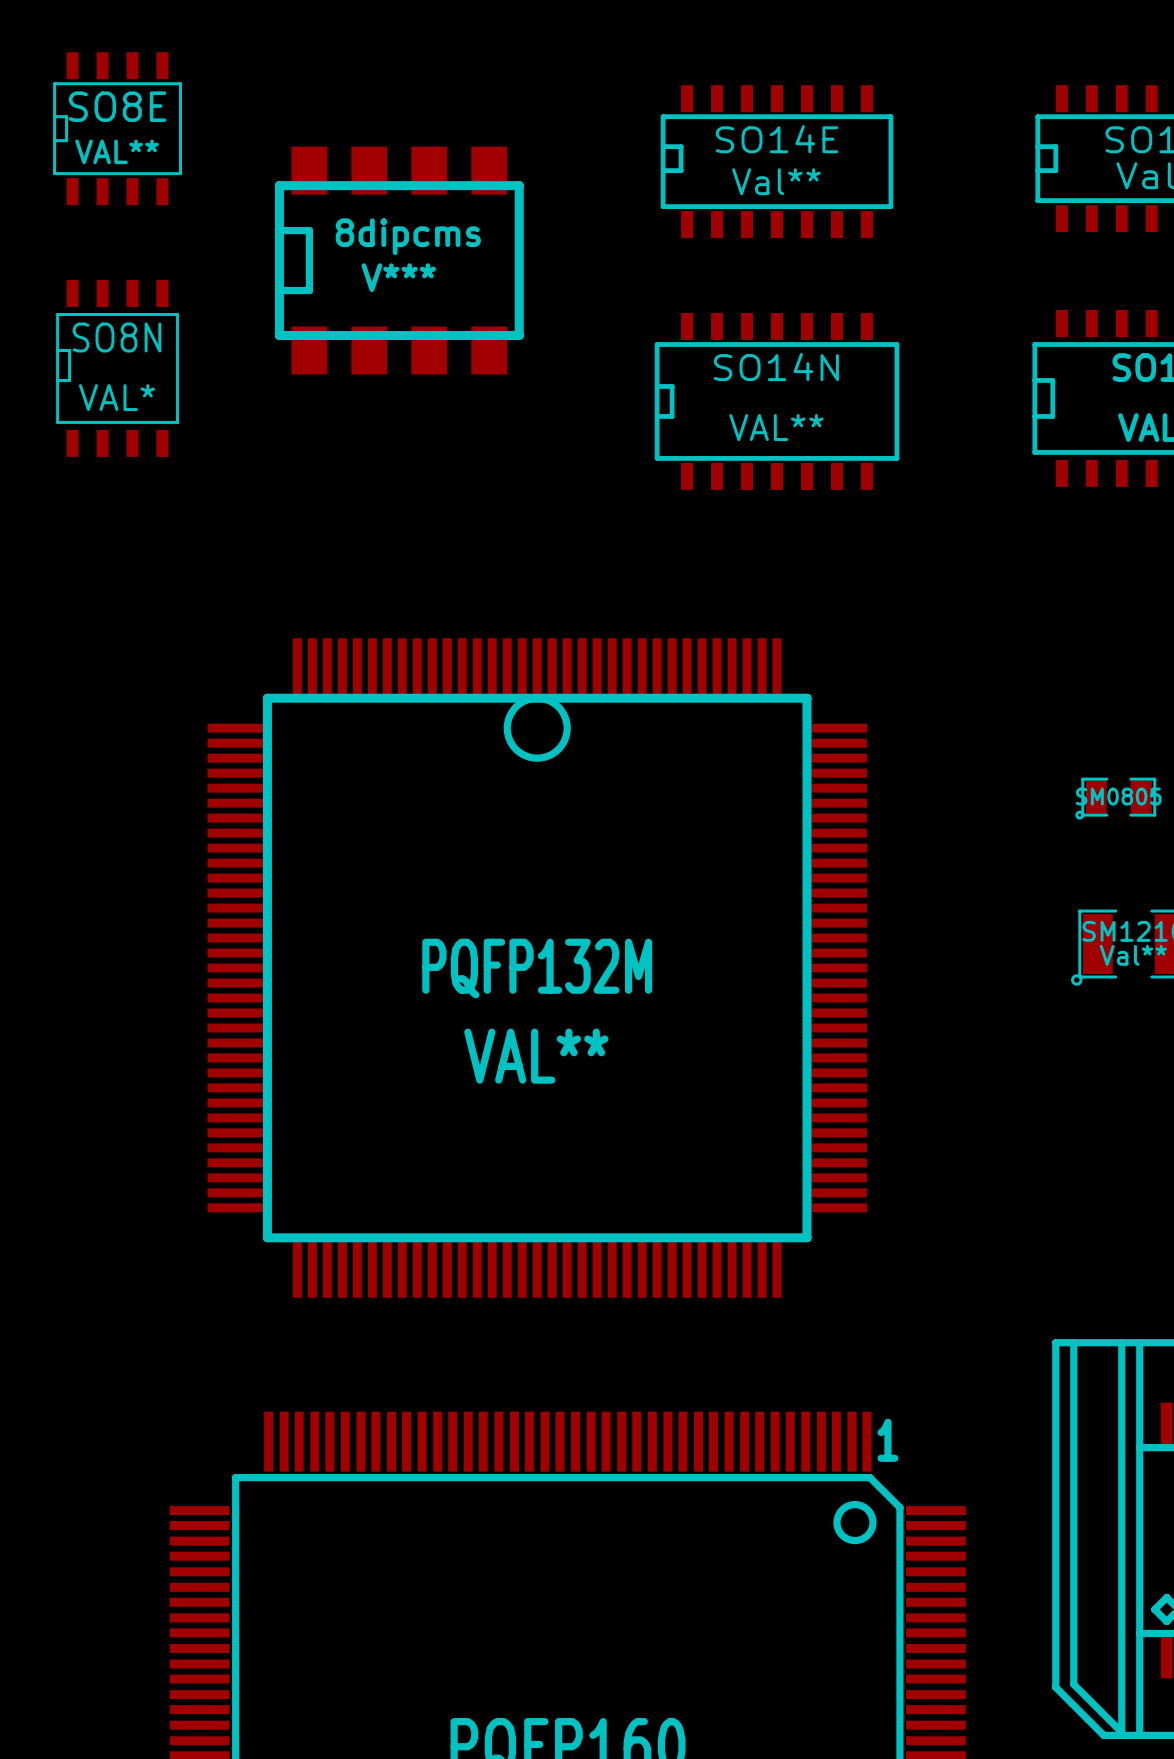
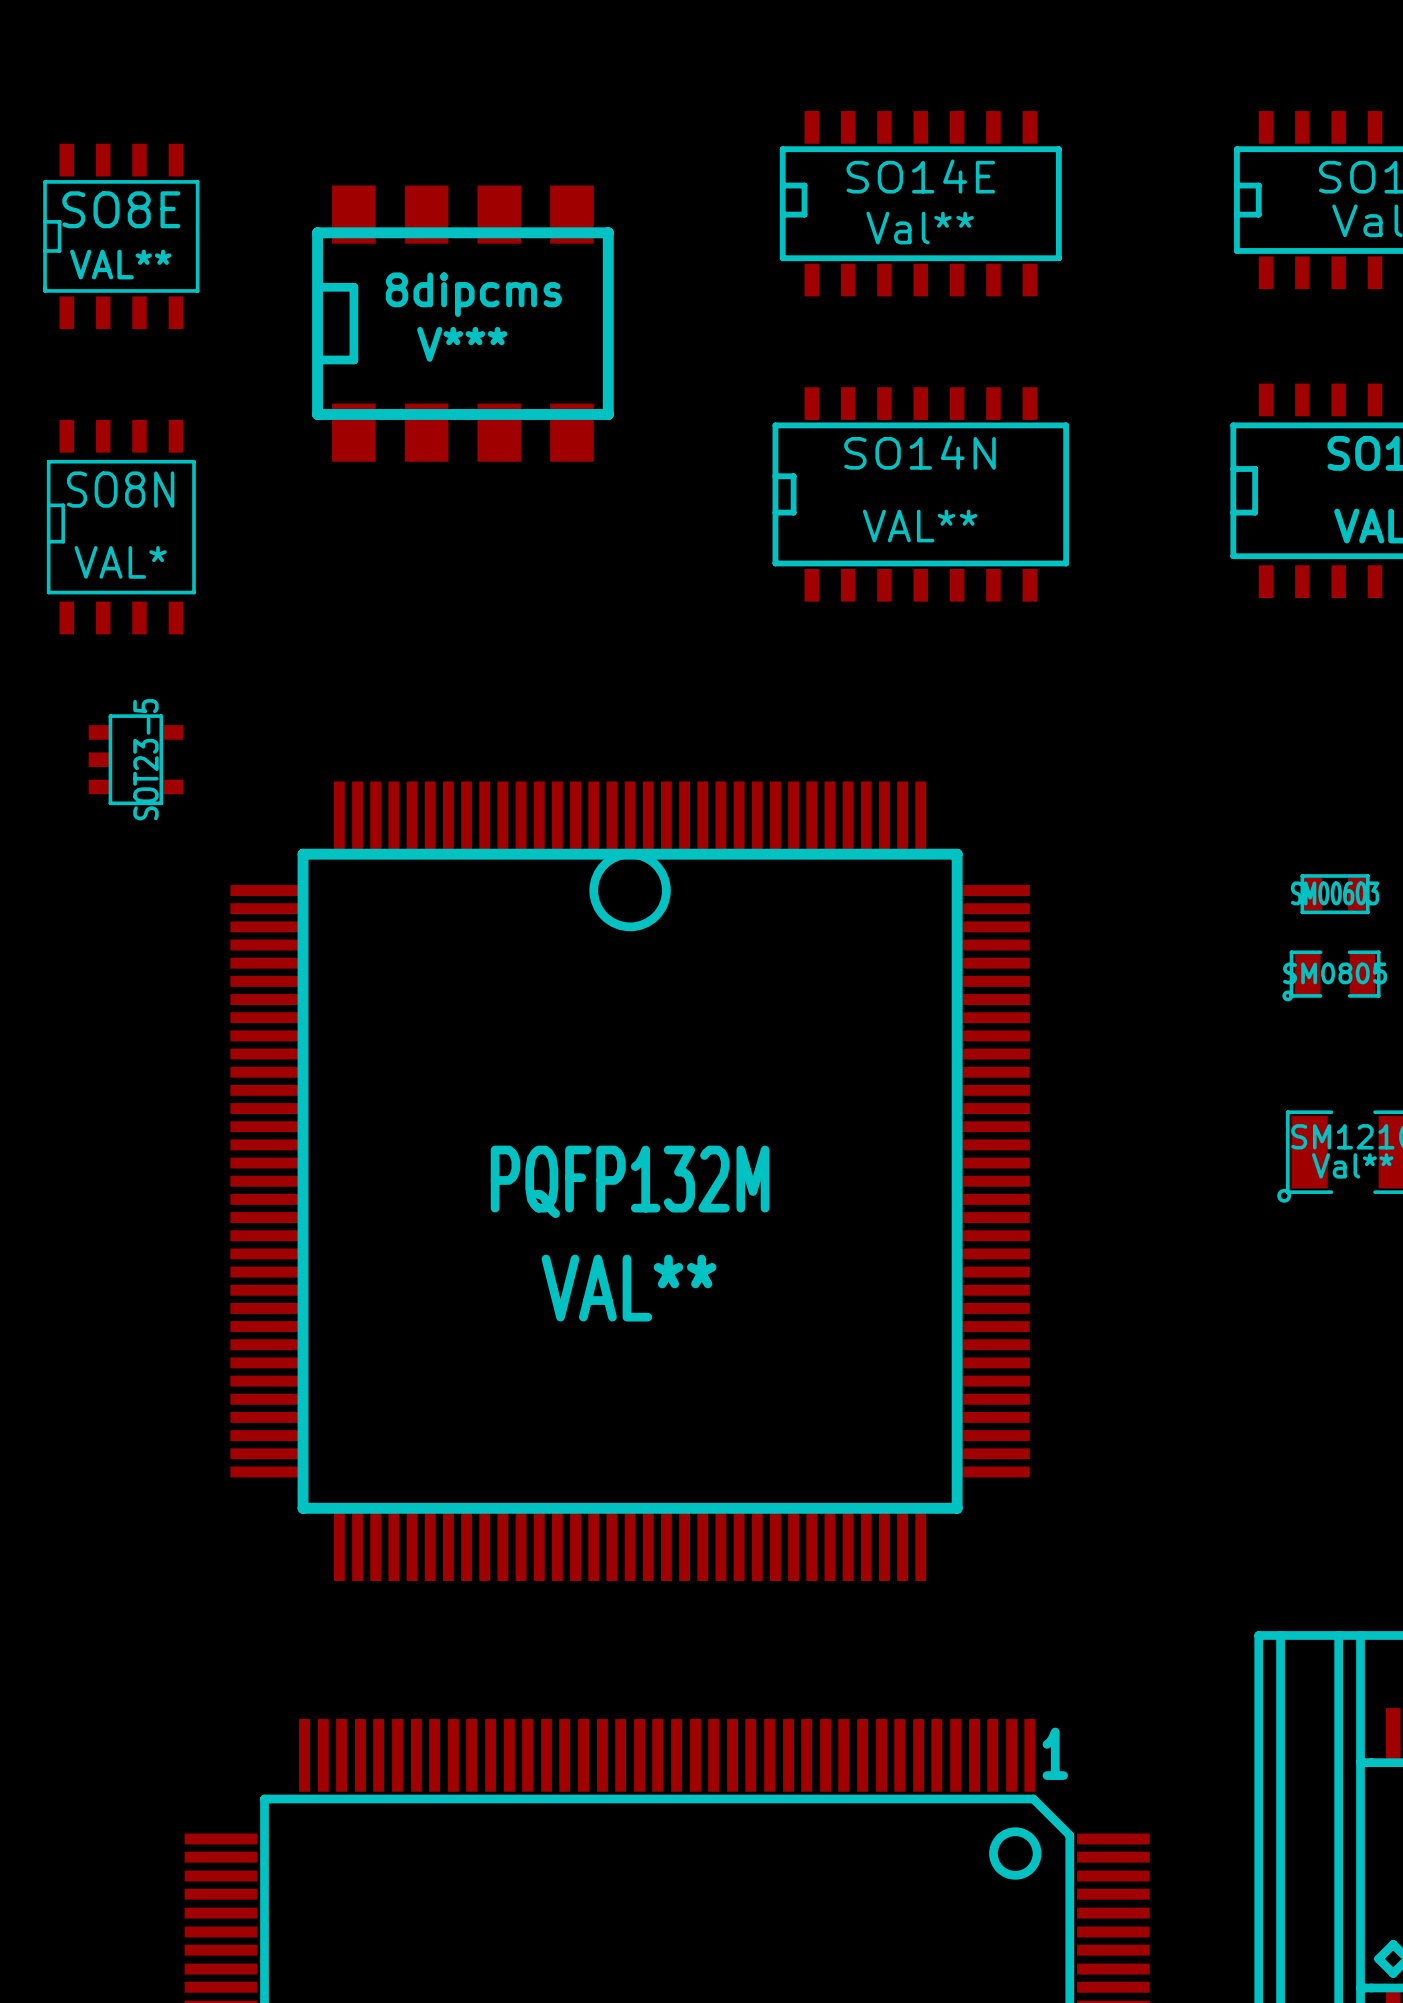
SO8E position: (117, 128) -> (121, 236)
SO8N position: (110, 368) -> (112, 527)
SOT23-5: none -> (135, 759)
SM00603: none -> (1335, 894)

